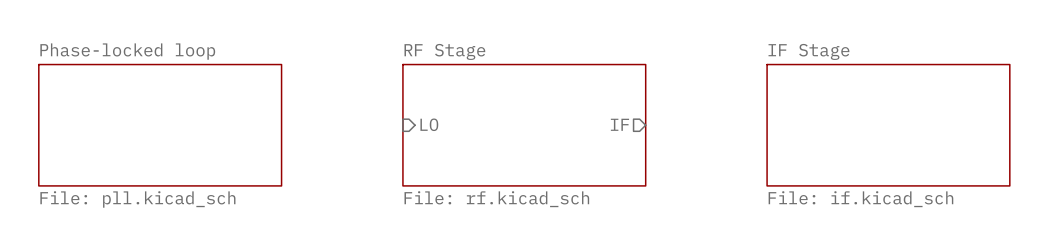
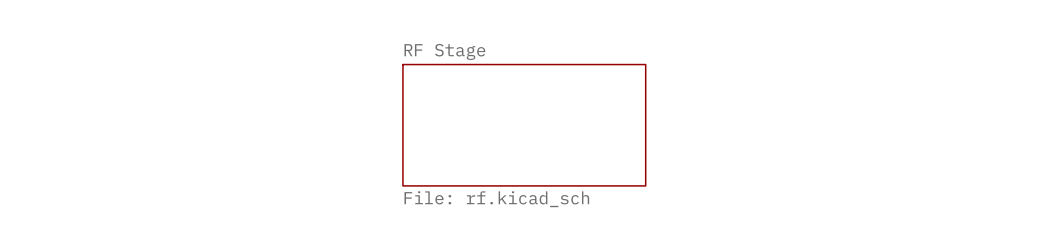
sheet pin: LO (429, 124) -> none
sheet pin: IF (619, 124) -> none
sheet Phase-locked loop: File: pll.kicad_sch (160, 125) -> none
sheet IF Stage: File: if.kicad_sch (888, 125) -> none

